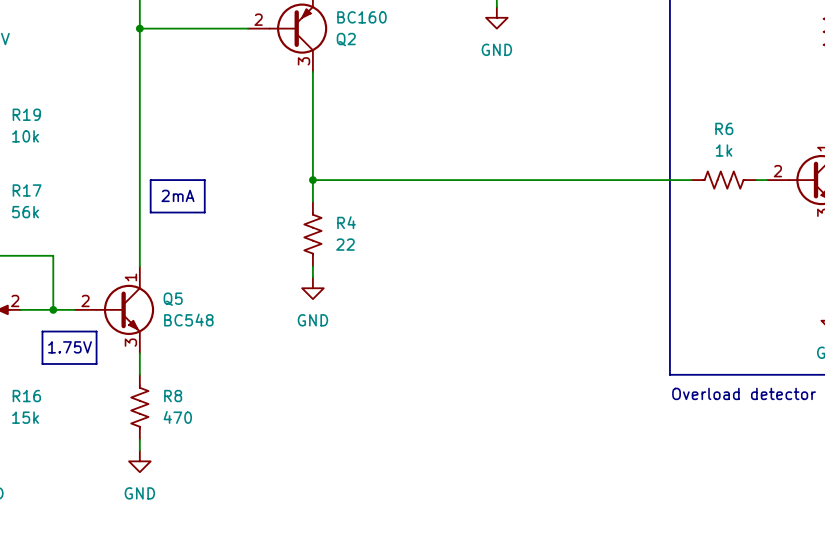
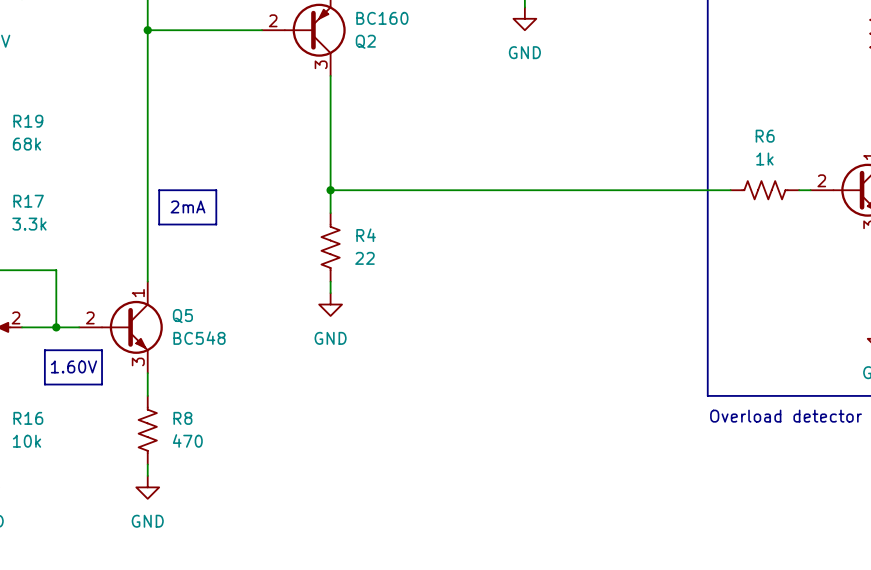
R19 value: 10k (25, 136) -> 68k (27, 144)
R17 value: 56k (25, 212) -> 3.3k (29, 224)
text: 1.75V (70, 347) -> 1.60V (73, 366)
R16 value: 15k (25, 417) -> 10k (27, 441)

